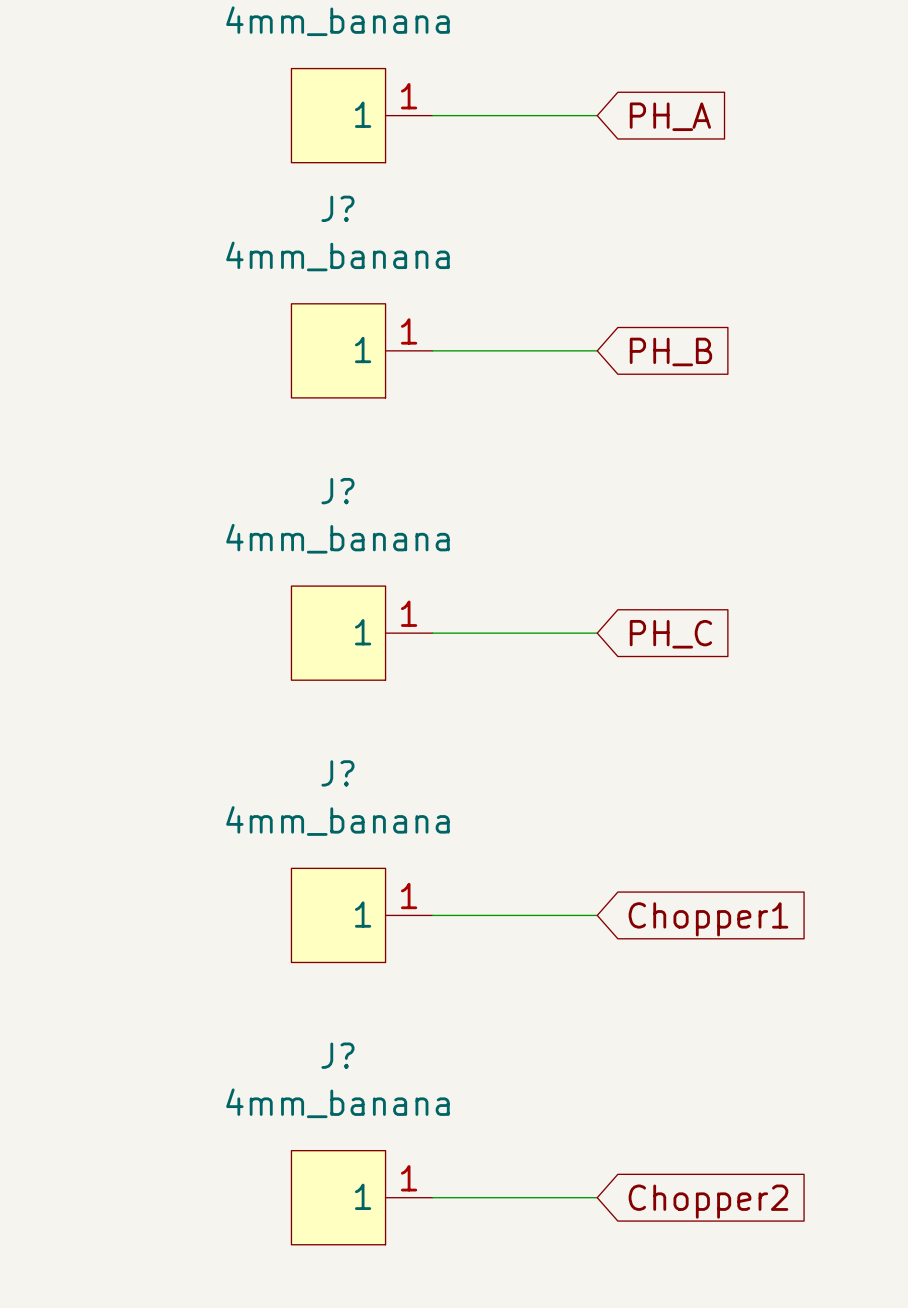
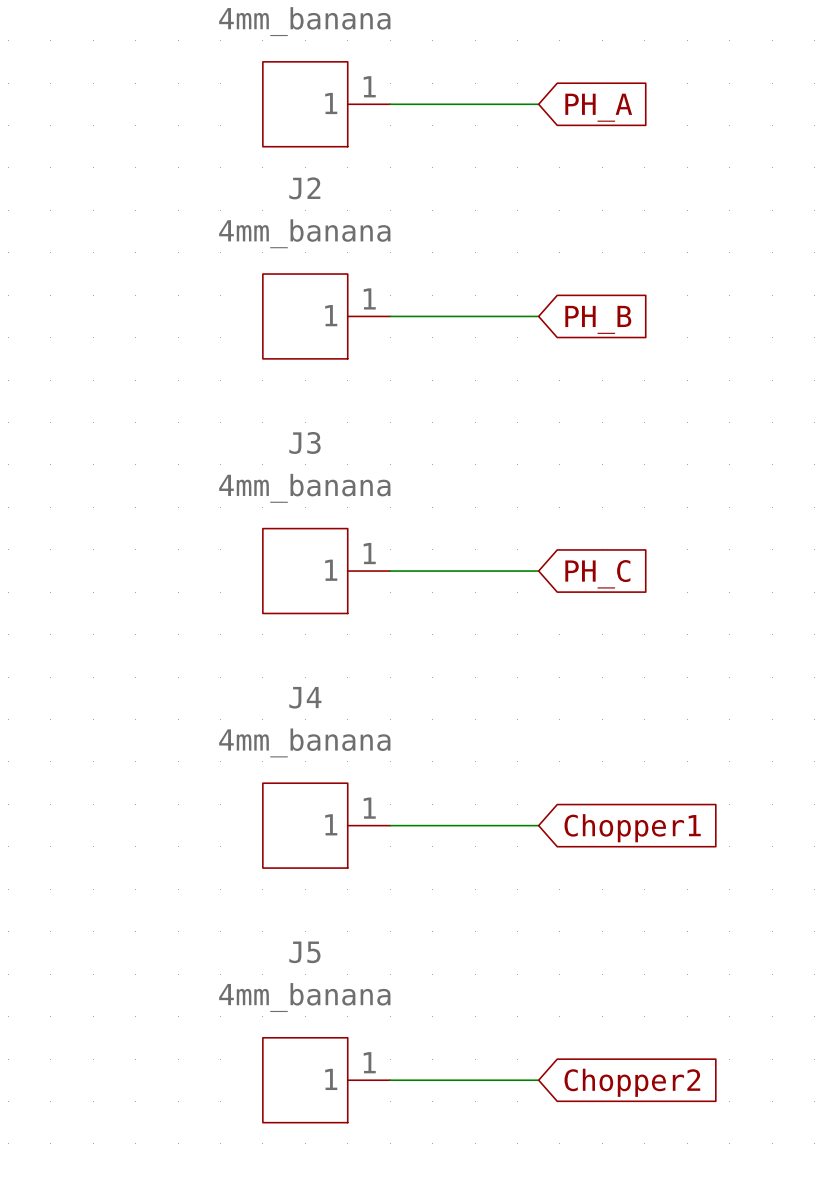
J? name: J? (337, 208) -> J2 (304, 188)
J? name: J? (337, 491) -> J3 (304, 442)
J? name: J? (337, 773) -> J4 (305, 697)
J? name: J? (337, 1055) -> J5 (304, 952)

